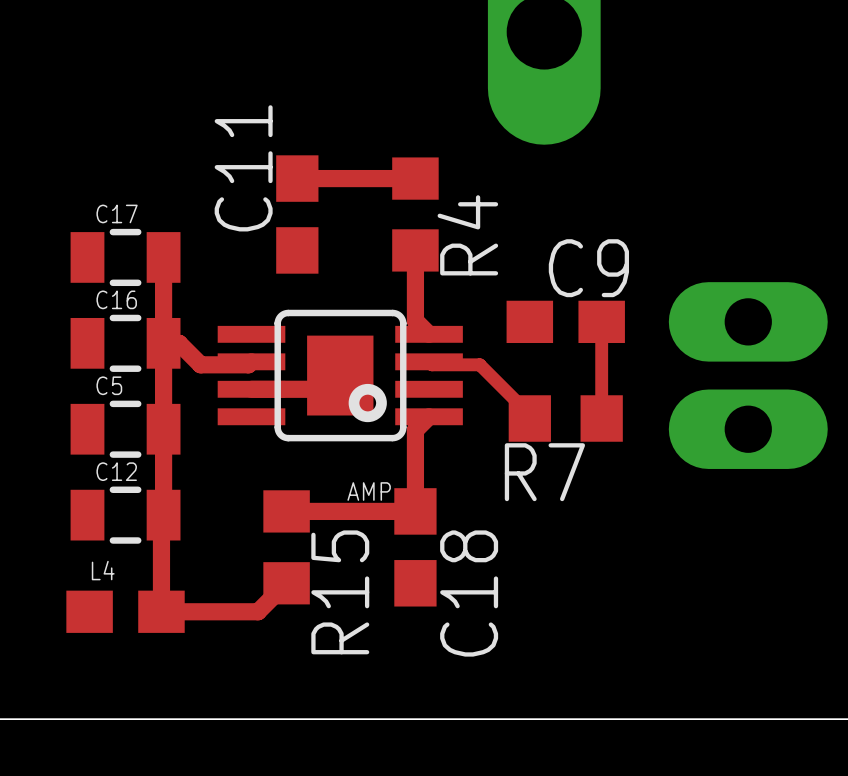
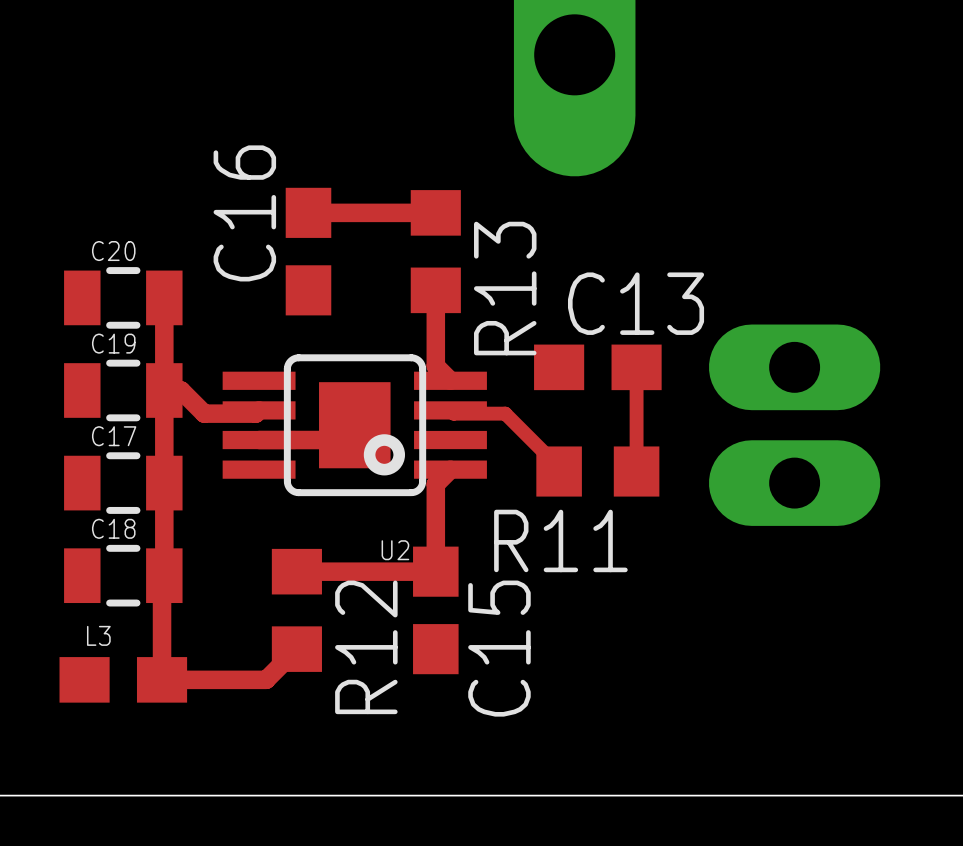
C11 name: C11 (243, 168) -> C16 (244, 213)
C17 name: C17 (117, 213) -> C20 (113, 251)
R4 name: R4 (467, 235) -> R13 (505, 288)
C9 name: C9 (588, 268) -> C13 (636, 303)
C16 name: C16 (116, 299) -> C19 (113, 343)
C5 name: C5 (109, 385) -> C17 (114, 436)
C12 name: C12 (116, 471) -> C18 (113, 528)
R7 name: R7 (544, 472) -> R11 (560, 540)
AMP name: AMP (369, 491) -> U2 (395, 550)
L4 name: L4 (103, 570) -> L3 (98, 635)
R15 name: R15 (340, 592) -> R12 (366, 647)
C18 name: C18 (469, 593) -> C15 (499, 648)

